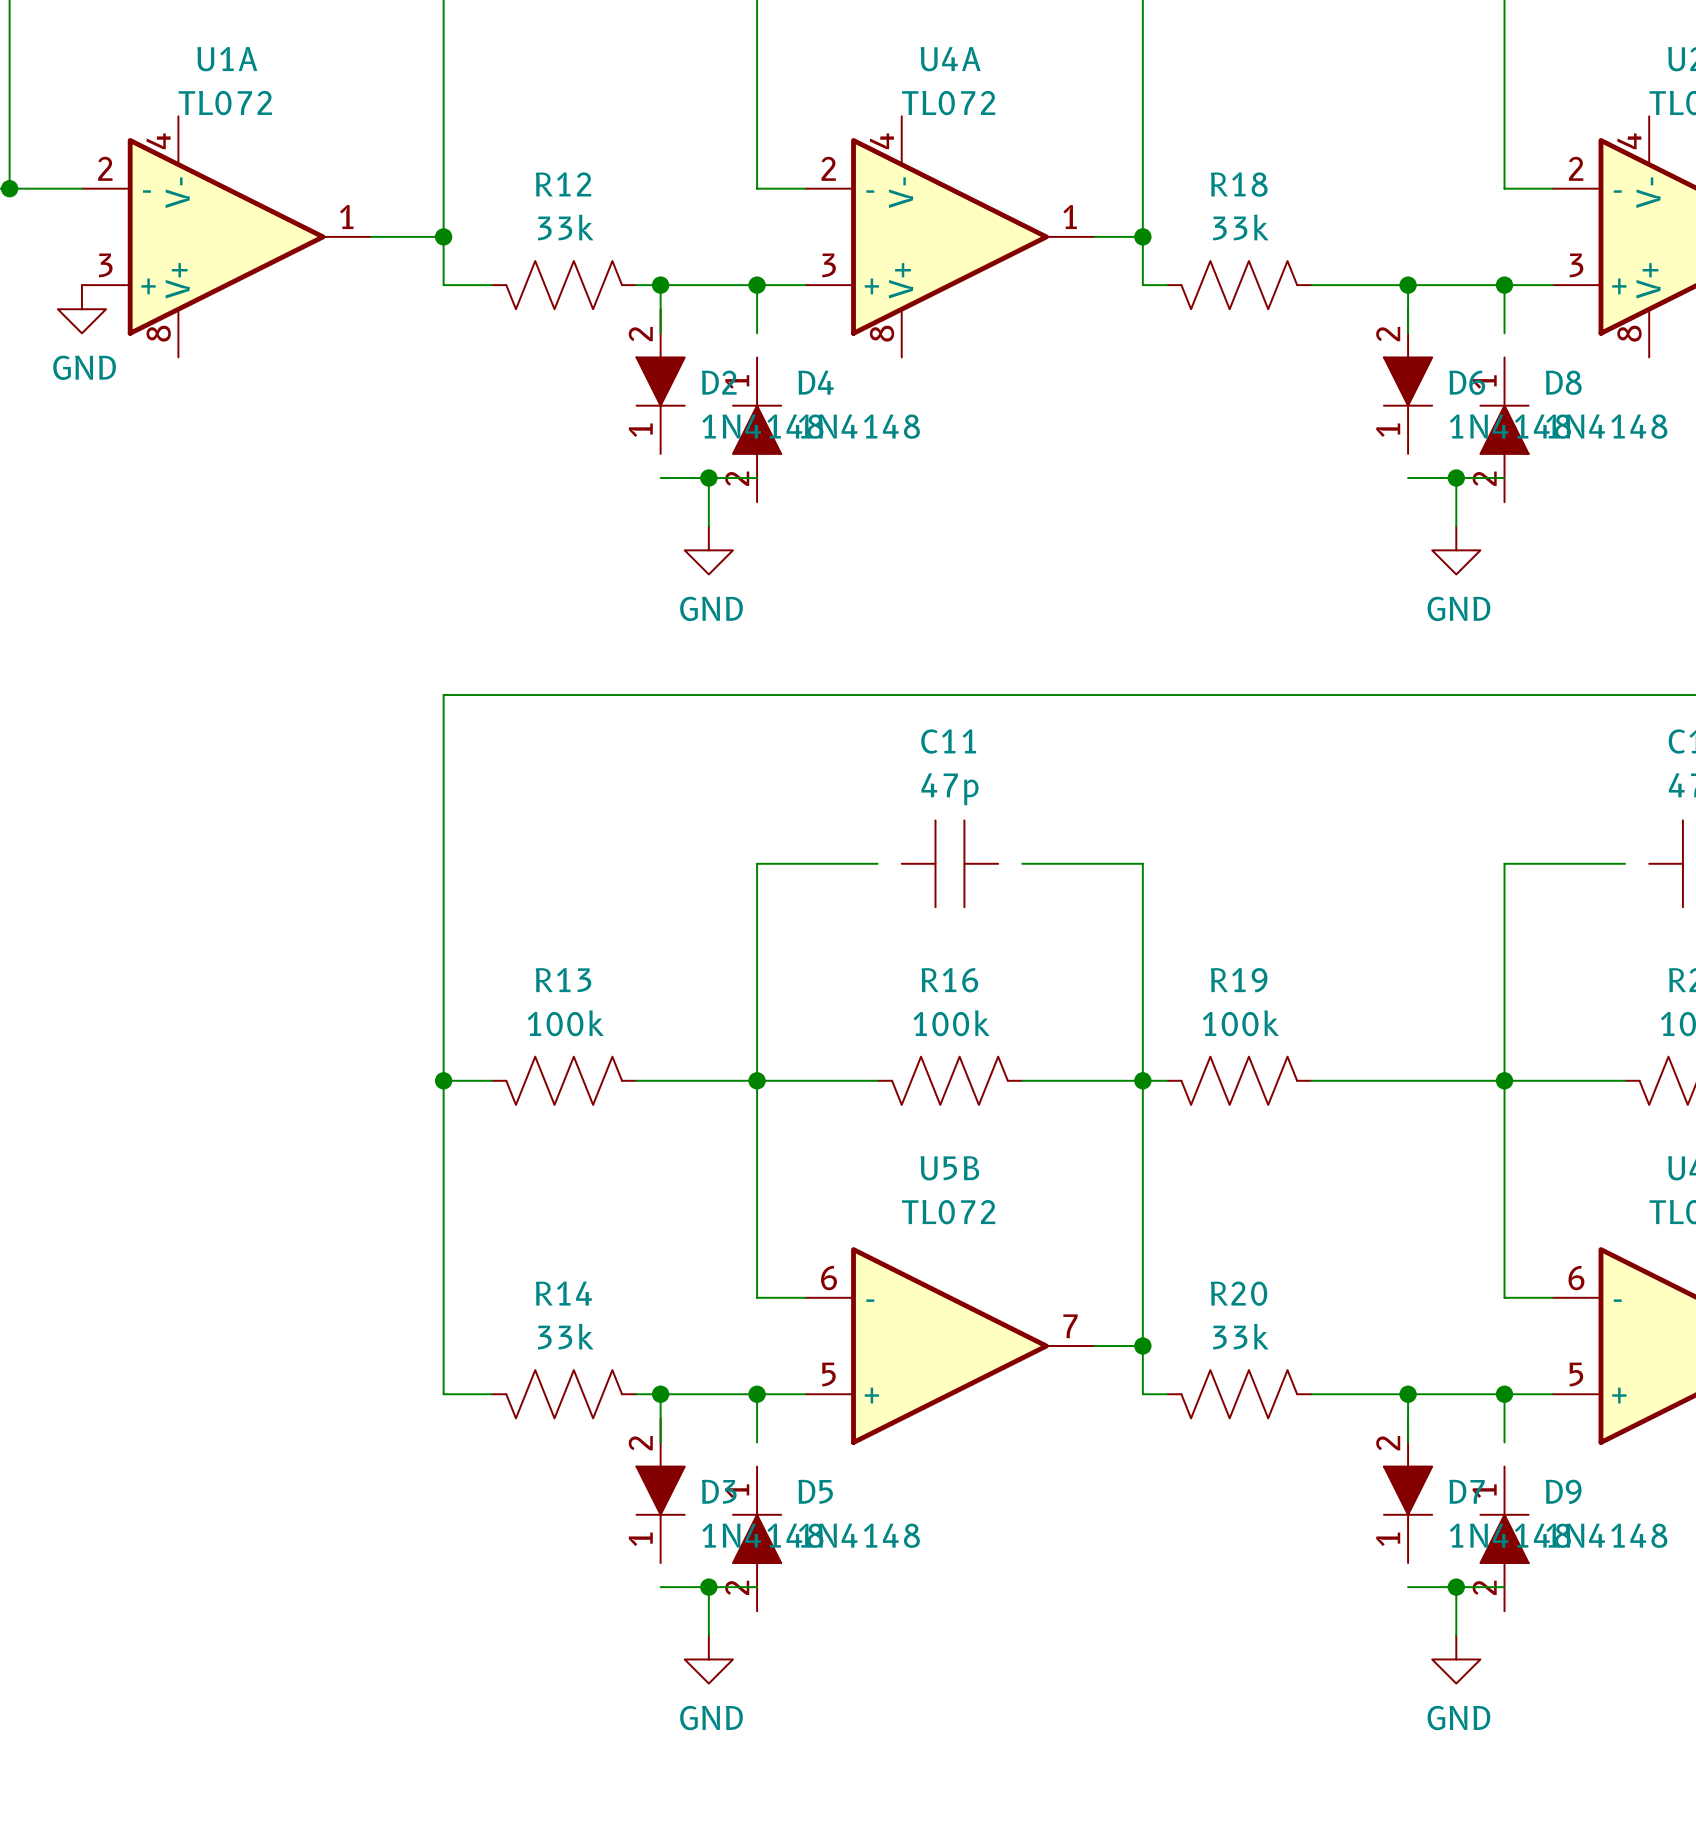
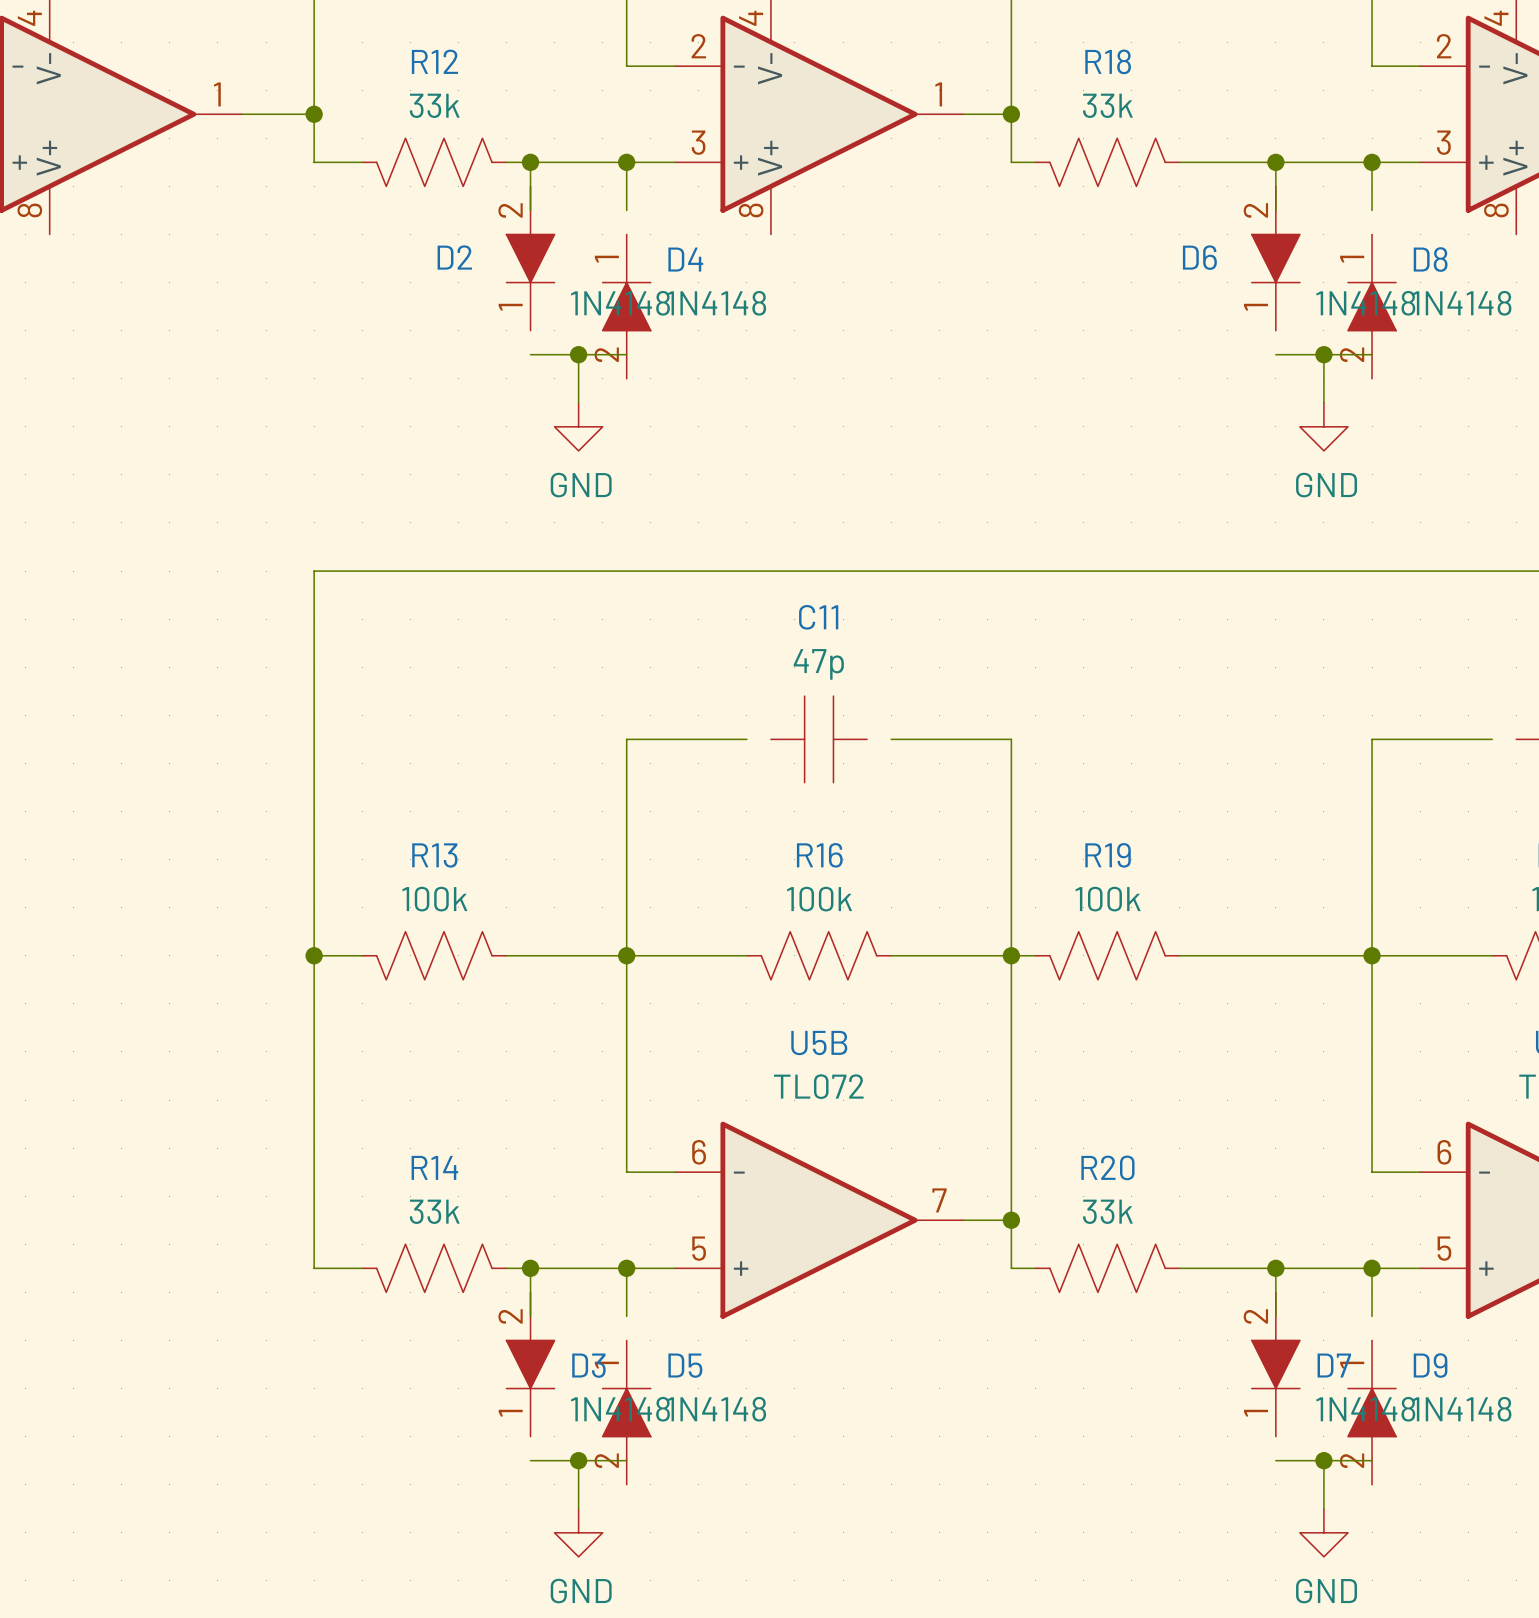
D2 name position: D2 (719, 382) -> D2 (454, 257)
D6 name position: D6 (1467, 382) -> D6 (1199, 257)

